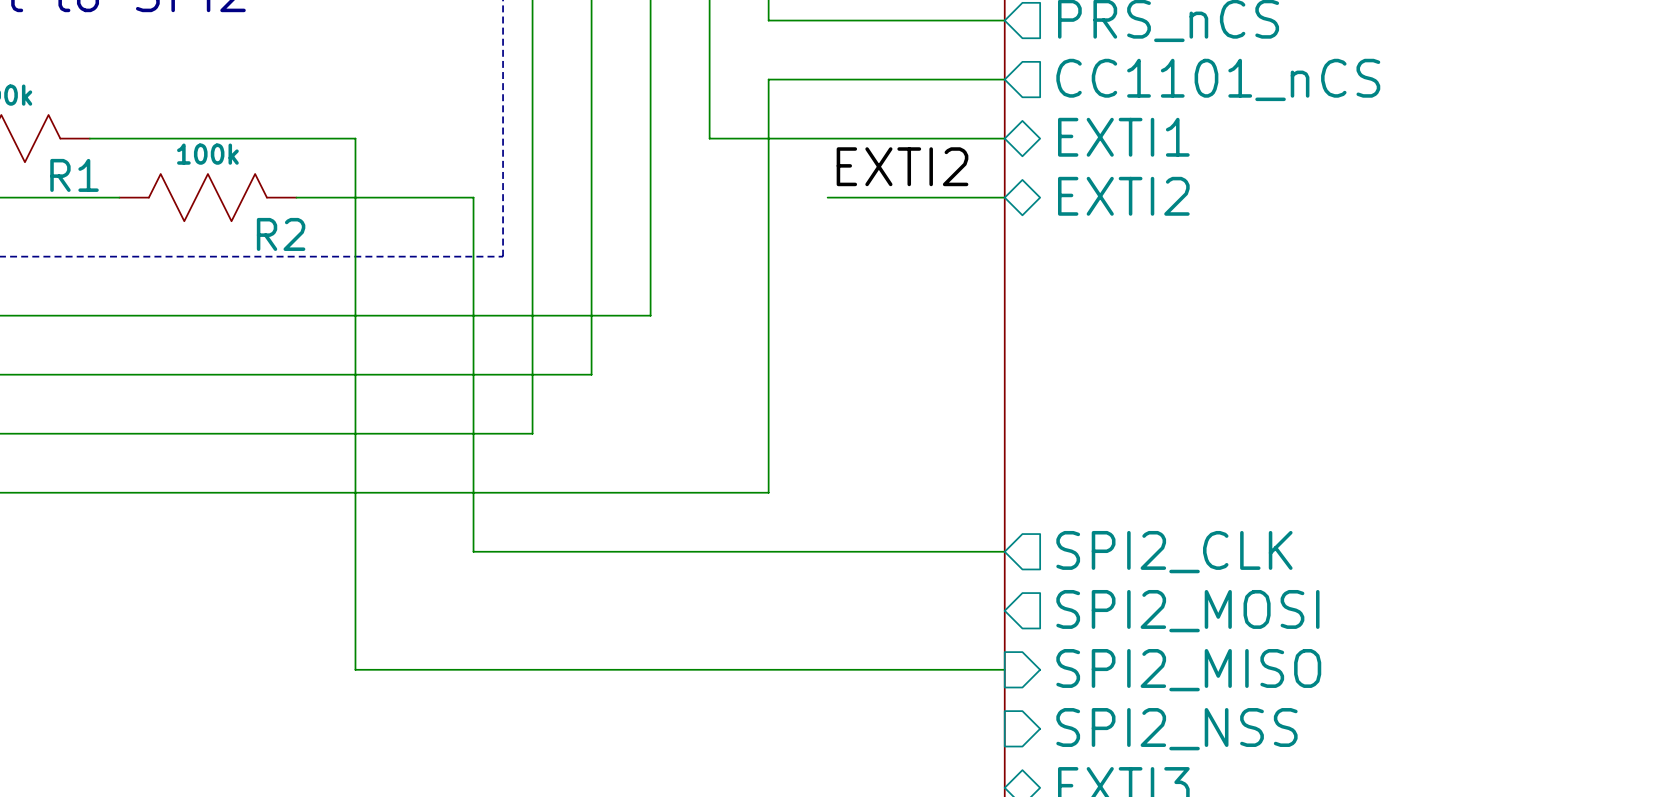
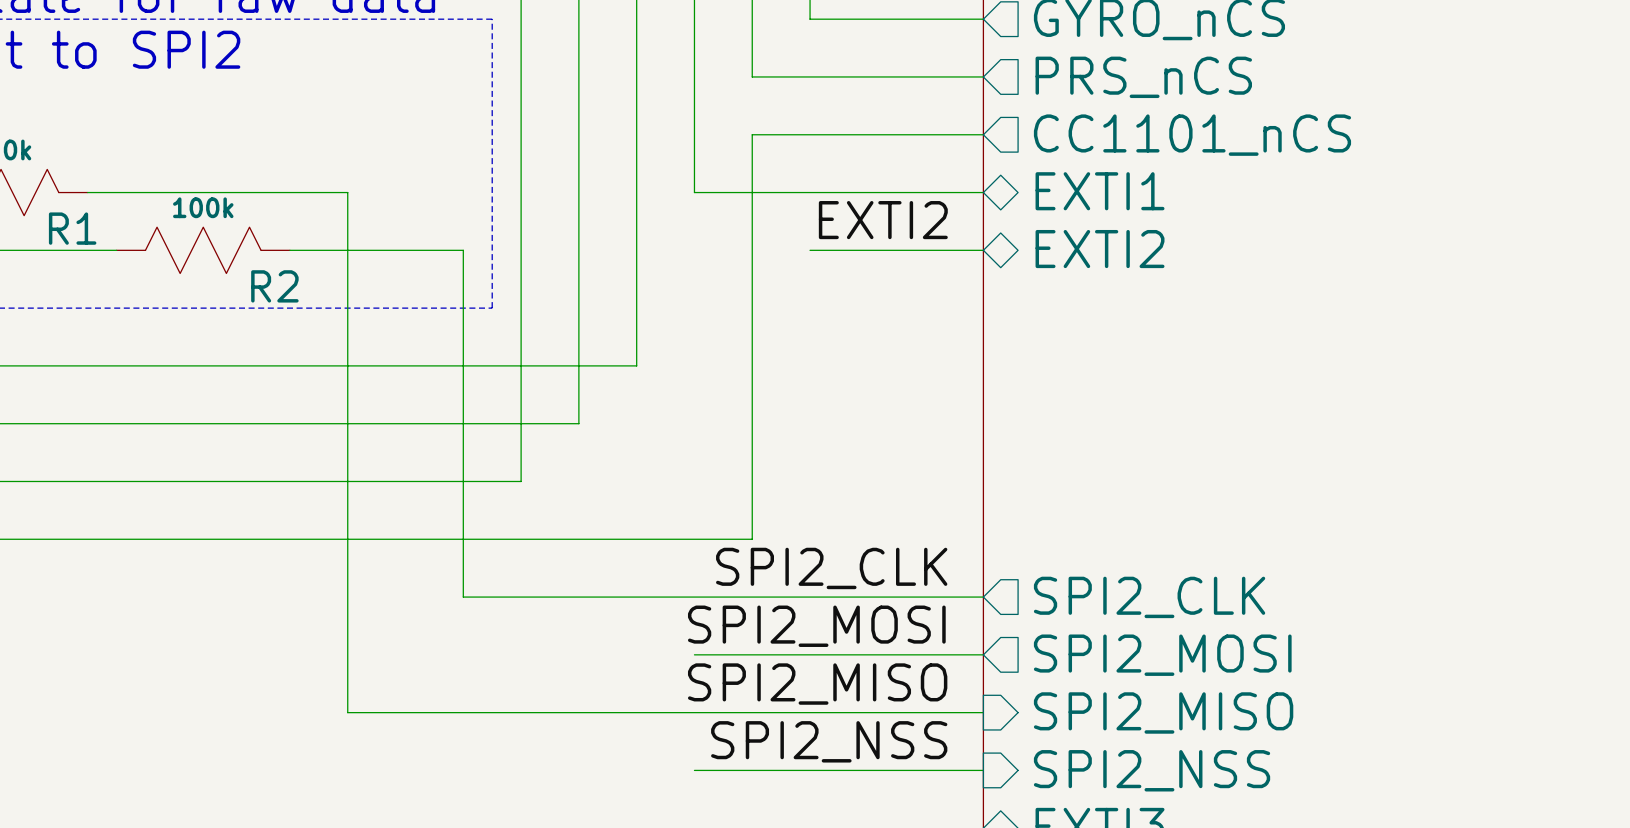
label: none -> SPI2_CLK (831, 568)
label: none -> SPI2_MOSI (816, 626)
wire: none -> (694, 654) (983, 654)
label: none -> SPI2_MISO (817, 684)
label: none -> SPI2_NSS (829, 741)
wire: none -> (694, 770) (983, 770)

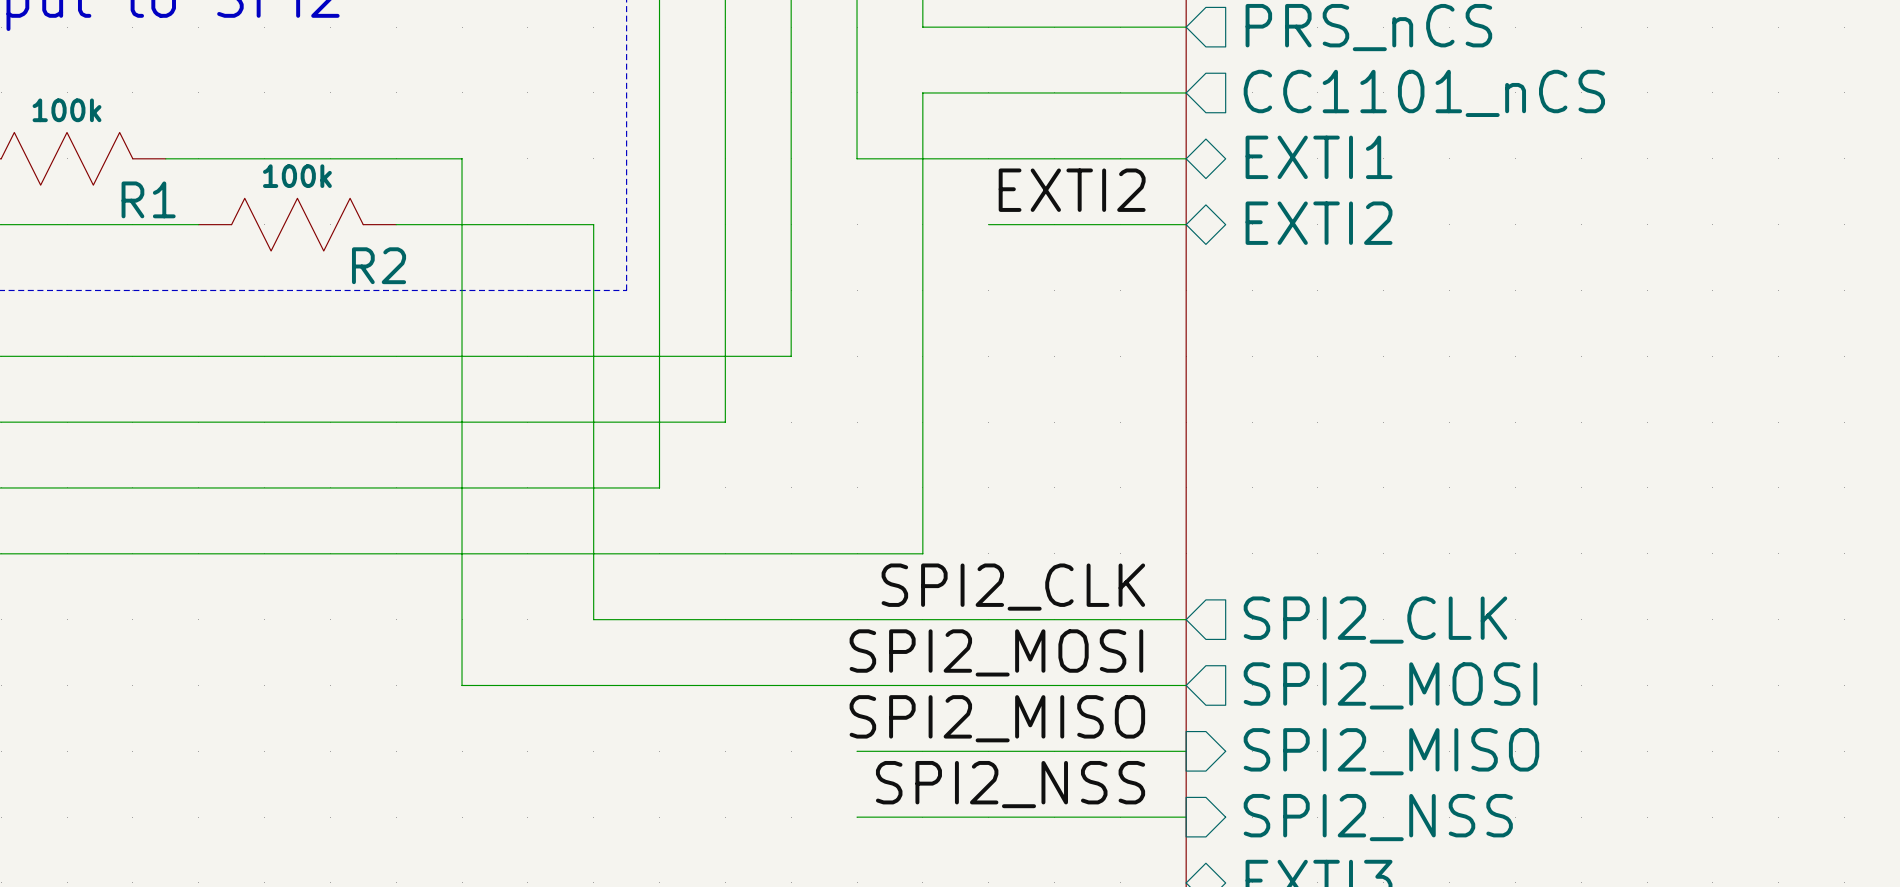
wire: (347, 654) (347, 712) (694, 712) -> (462, 685) (857, 685)

